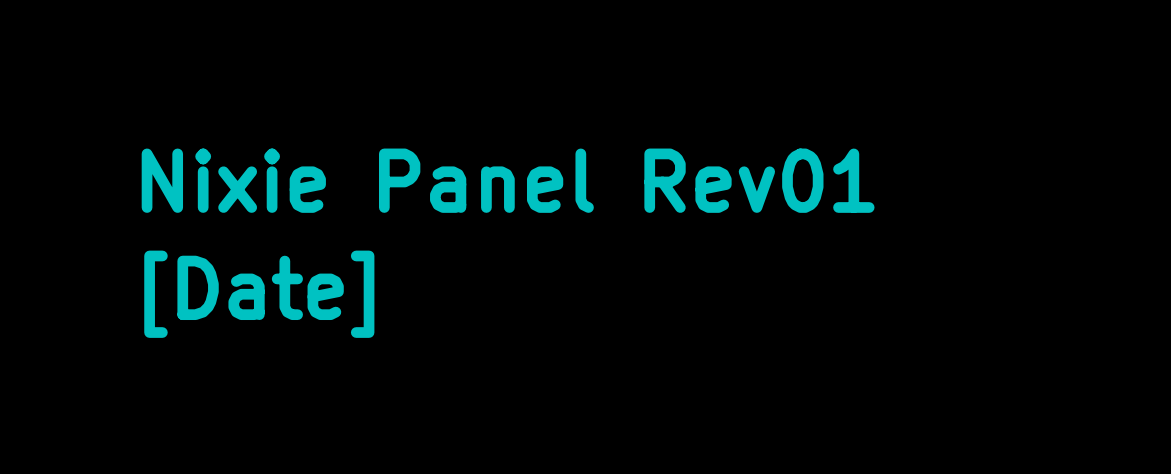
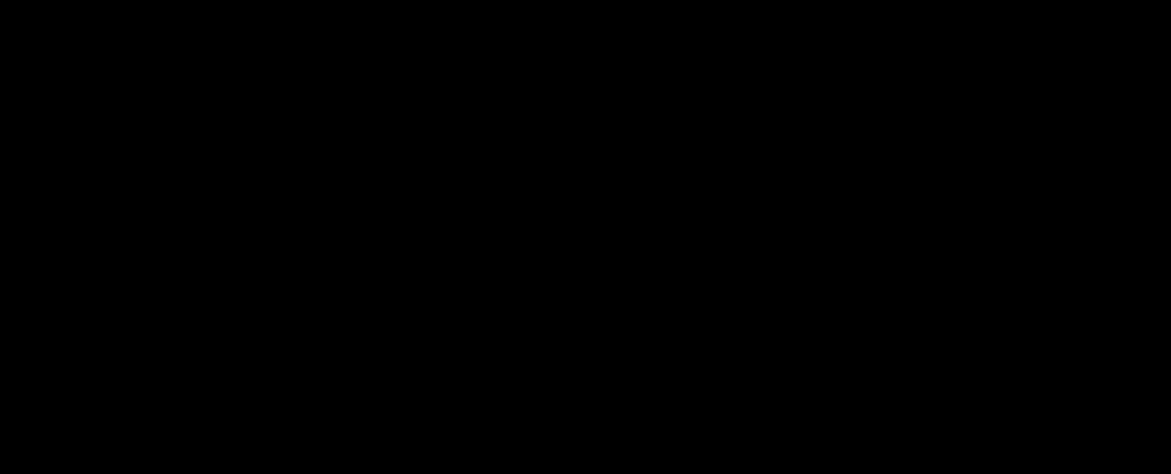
text: Nixie Panel Rev01 (508, 180) -> none
text: [Date] (259, 294) -> none

